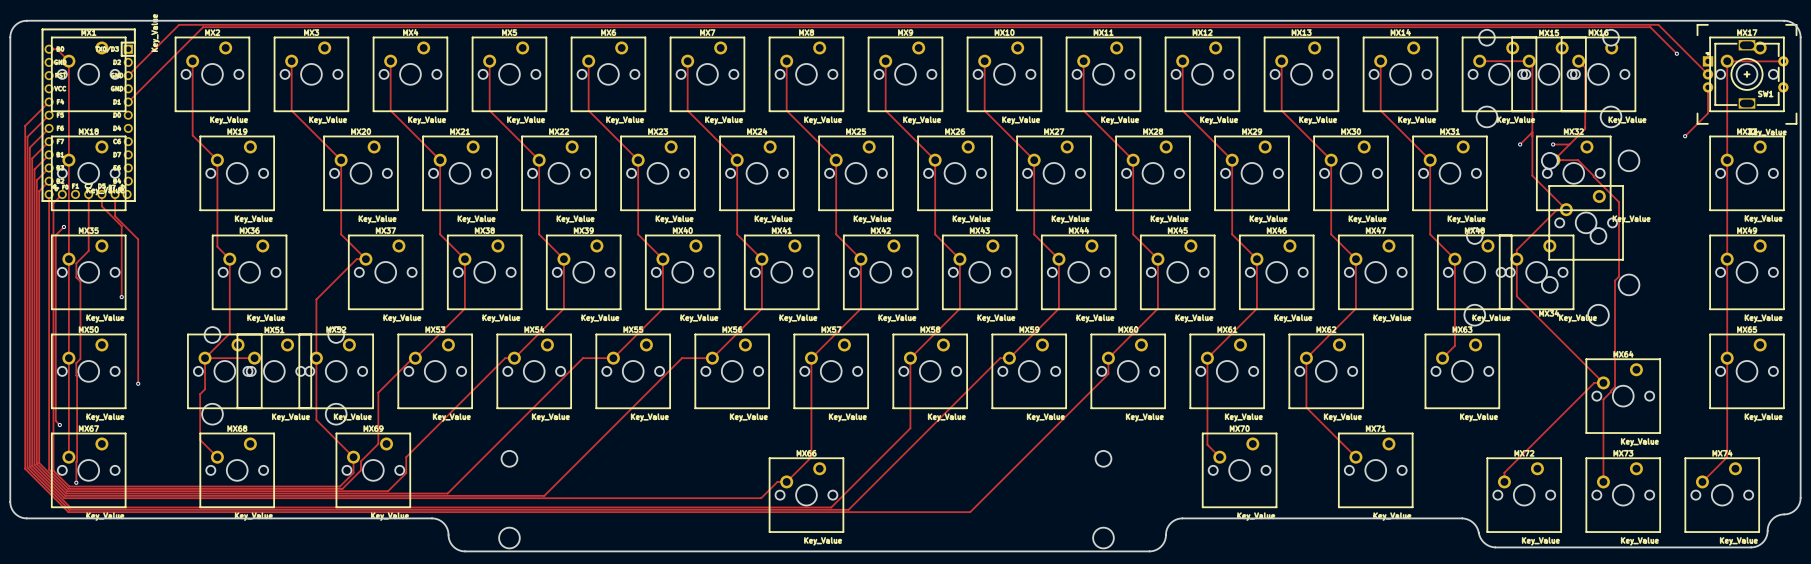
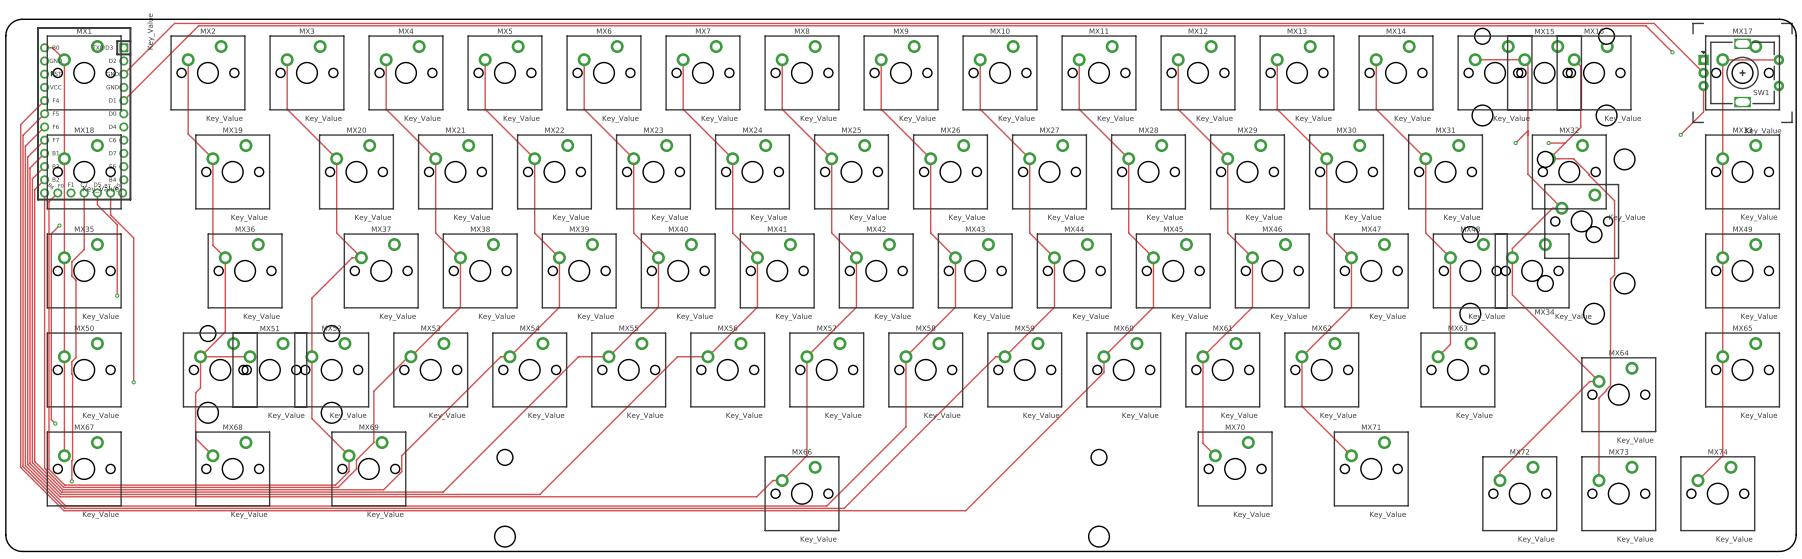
board edge: (10, 37) (10, 501) (13, 512) (23, 517) (433, 518) (440, 520) (446, 526) (449, 540) (453, 546) (465, 551) (1149, 551) (1156, 549) (1162, 545) (1170, 523) (1182, 518) (1462, 518) (1473, 522) (1483, 541) (1495, 547) (1751, 547) (1762, 542) (1771, 520) (1776, 516) (1794, 511) (1799, 504) (1800, 497) -> (5, 35) (5, 534) (9, 545) (18, 550) (1779, 551) (1789, 548) (1795, 539) (1796, 496)

